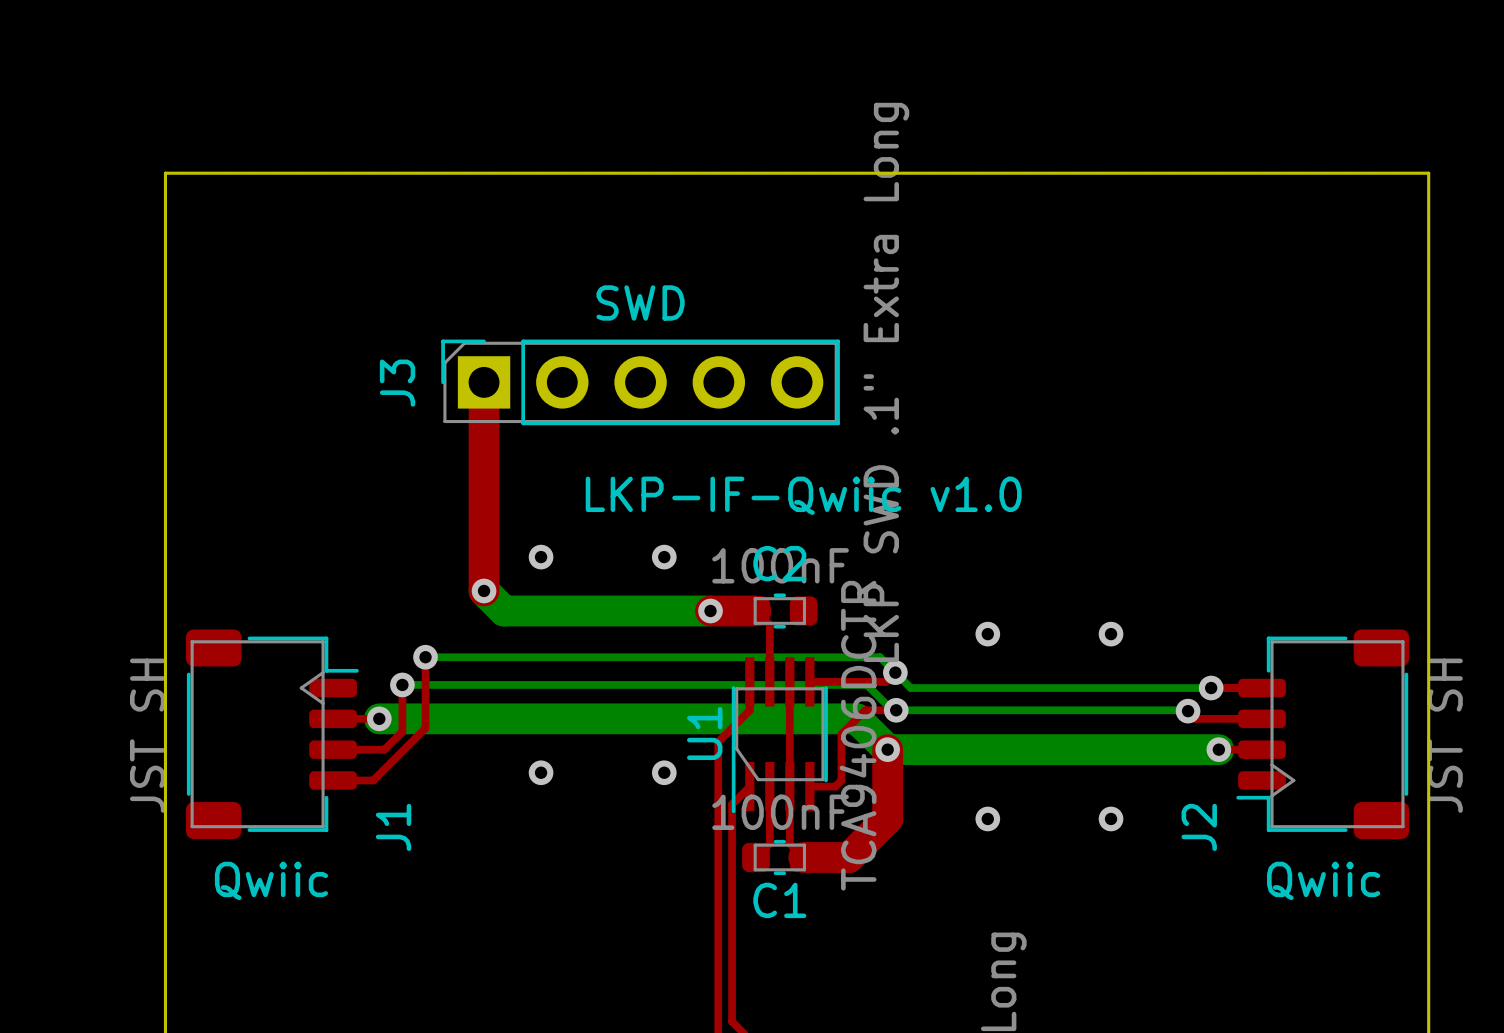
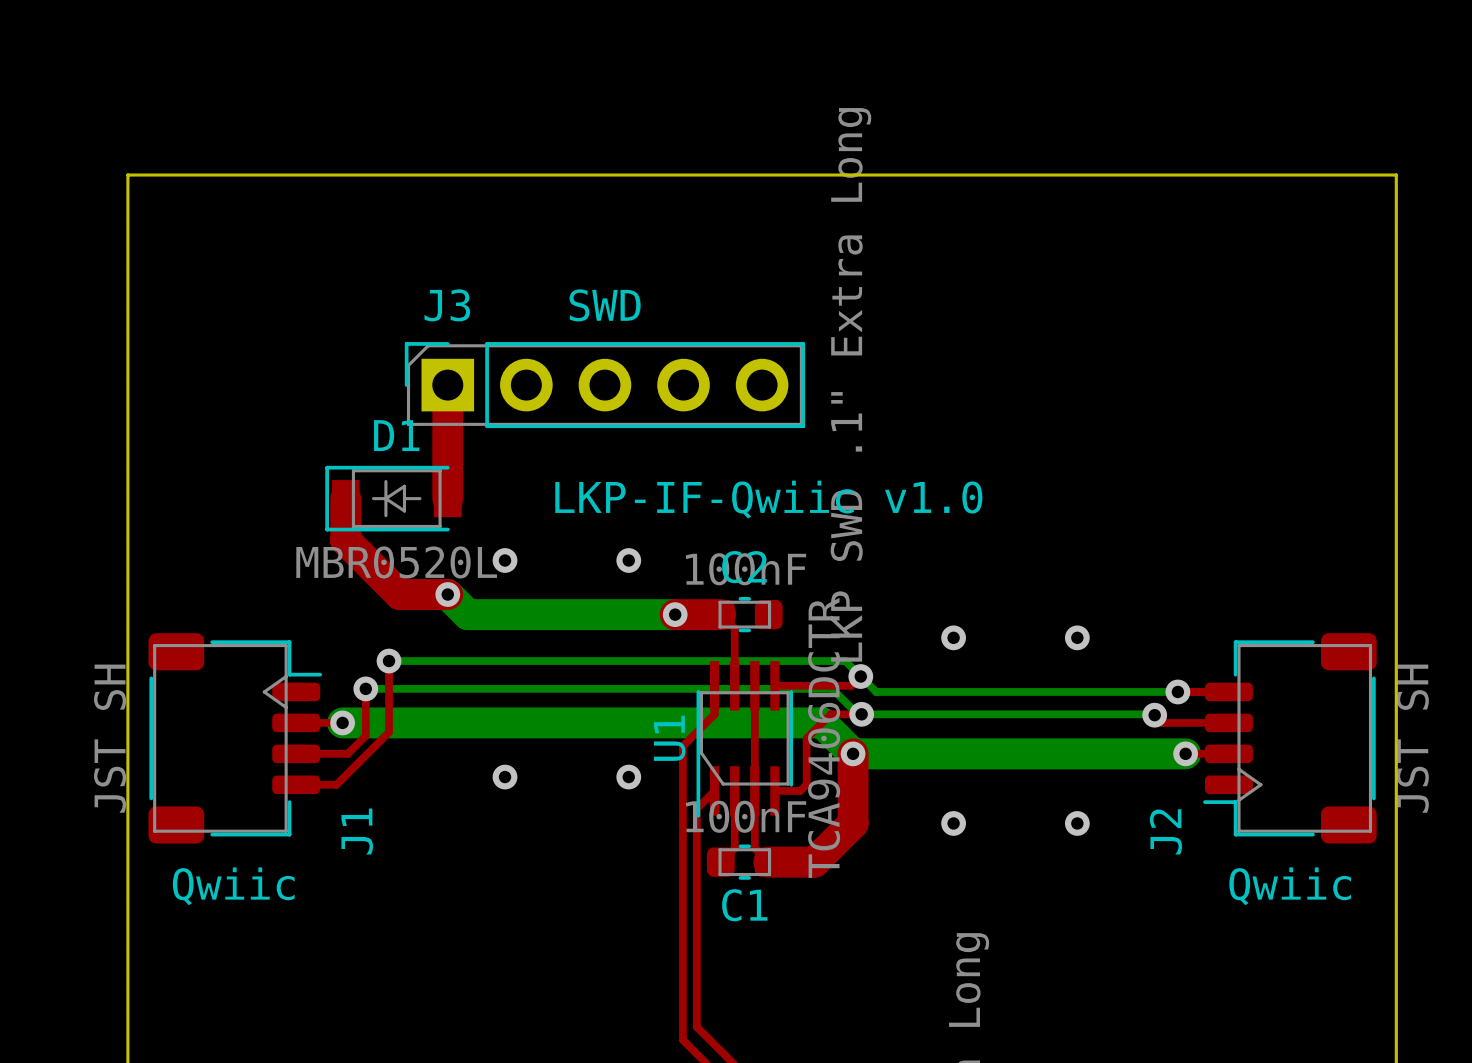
J3 name rotation: 0° (397, 383) -> 90° clockwise (447, 305)
J3 name position: J3 (397, 383) -> J3 (447, 305)
D1: none -> MBR0520L (393, 498)
top track: (484, 495) (484, 590) -> (345, 498) (345, 540) (399, 594) (447, 594)

